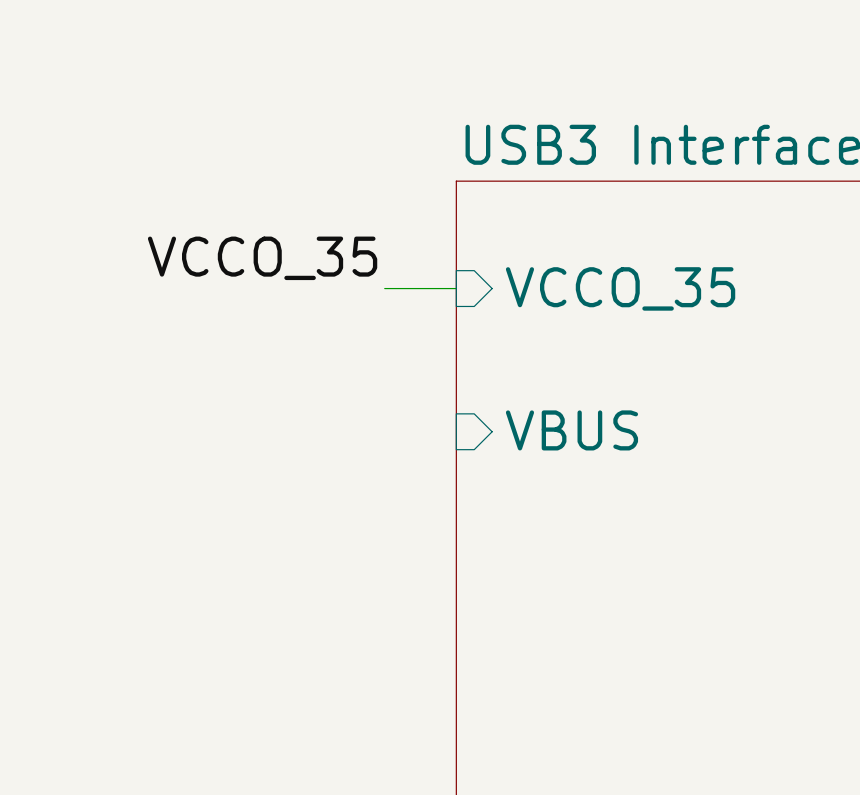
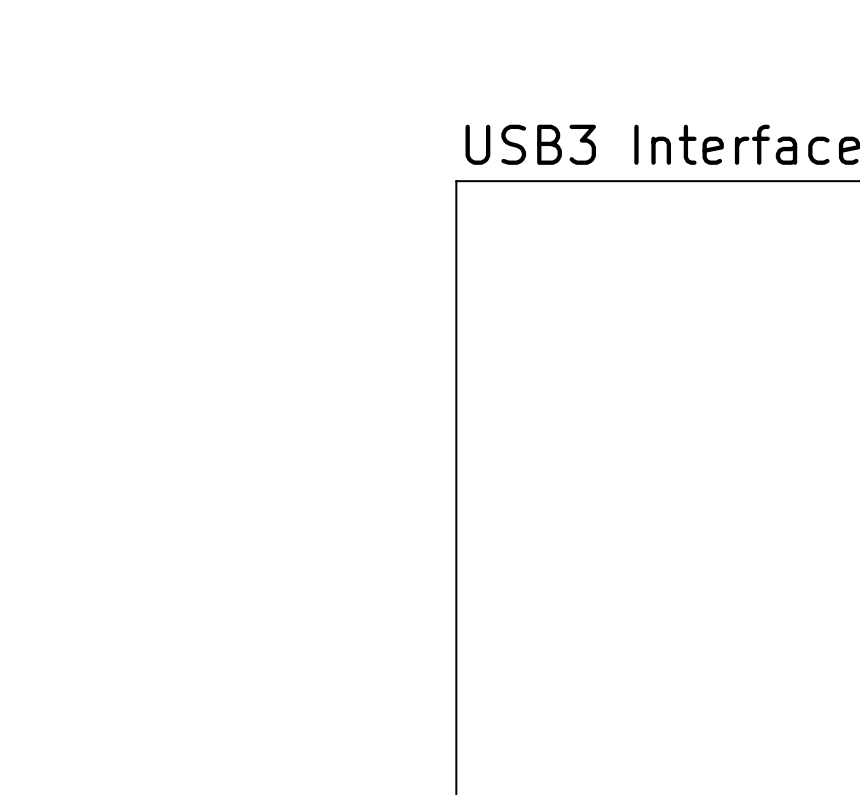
label: VCCO_35 (262, 258) -> none
wire: (384, 288) (456, 288) -> none
sheet pin: VCCO_35 (620, 288) -> none
sheet pin: VBUS (571, 430) -> none

